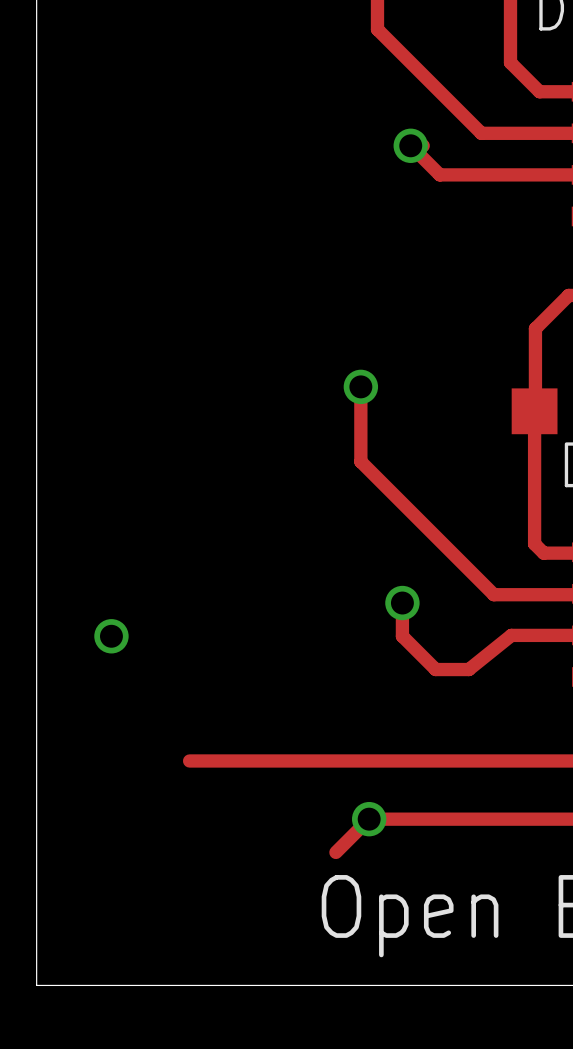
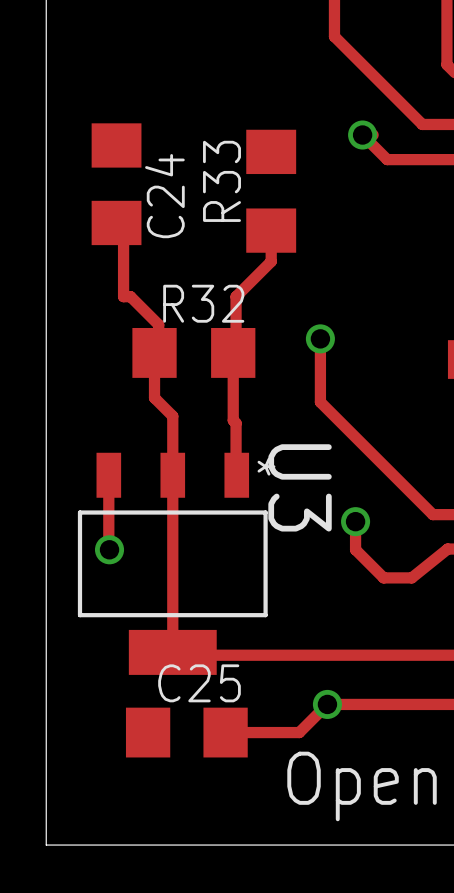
C24: none -> (116, 184)
R33: none -> (271, 191)
track: none -> (116, 222) (123, 222) (123, 296) (130, 296) (158, 324) (158, 348) (154, 352) (154, 397) (172, 416) (172, 652) (175, 655)
track: none -> (271, 230) (271, 261) (236, 296) (236, 350) (233, 352) (233, 420) (236, 423) (236, 475)
R32: none -> (193, 352)
track: none -> (108, 475) (108, 549)
U3: none -> (172, 563)
C25: none -> (186, 732)
track: none -> (225, 732) (299, 732)

